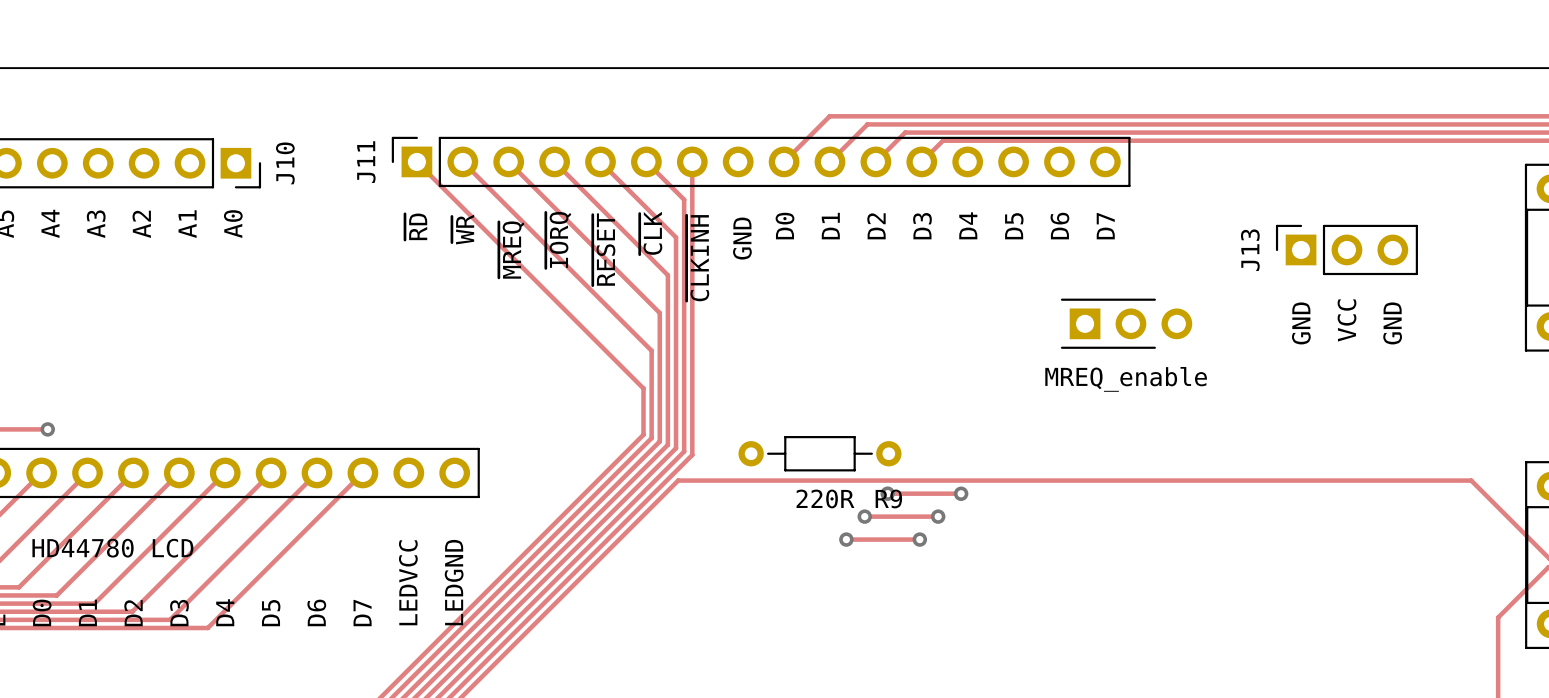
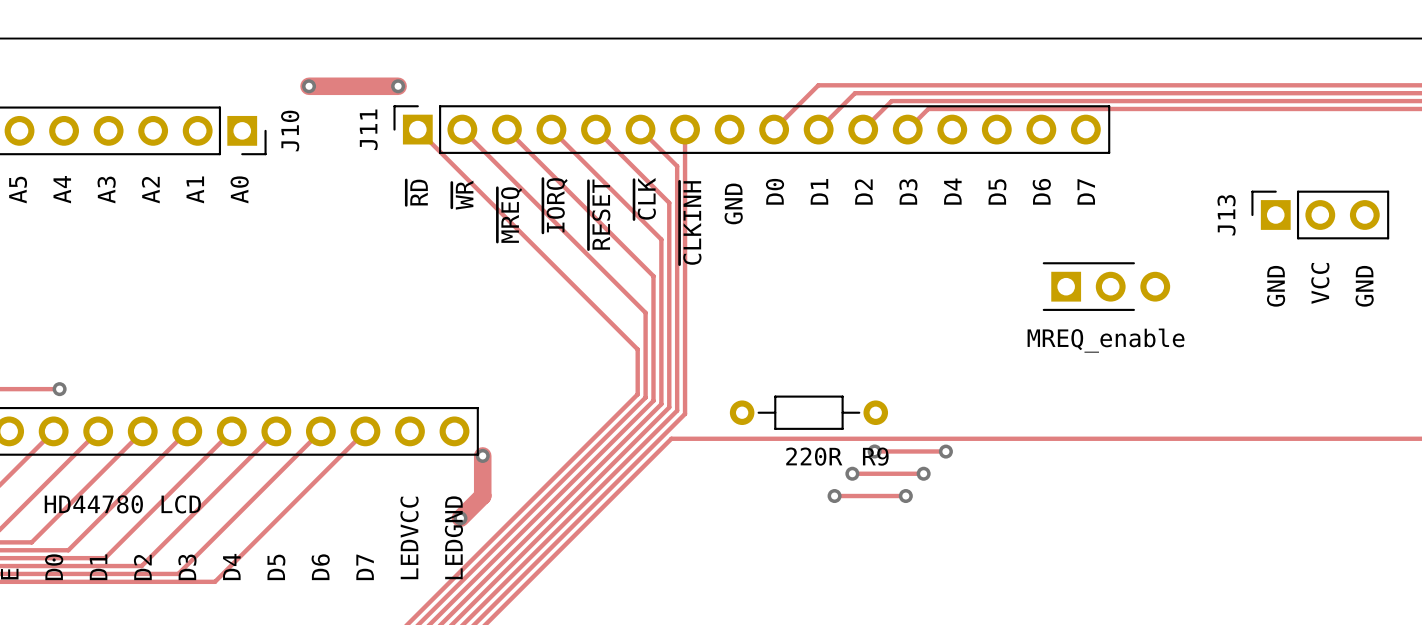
track: none -> (309, 86) (398, 86)
via: none -> (309, 86)
via: none -> (398, 86)
track: none -> (482, 455) (482, 496) (460, 518)
via: none -> (482, 455)
via: none -> (460, 518)

